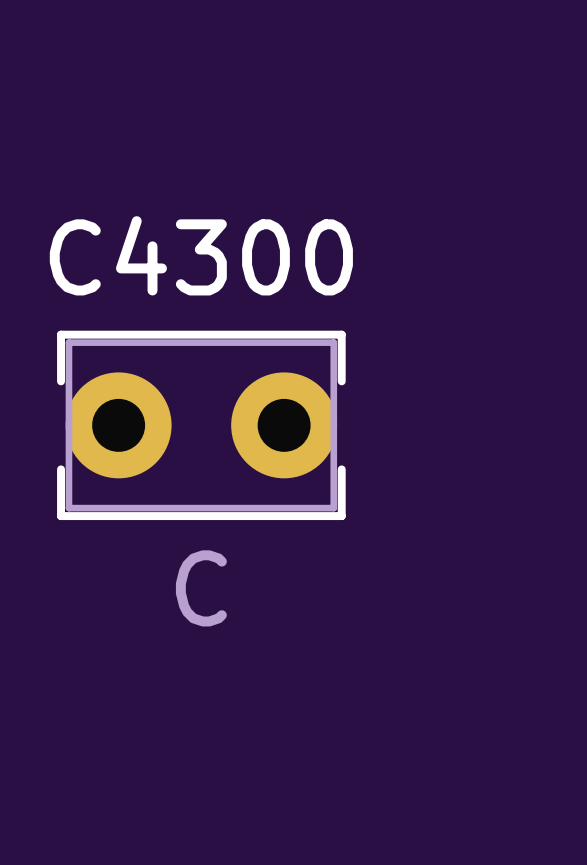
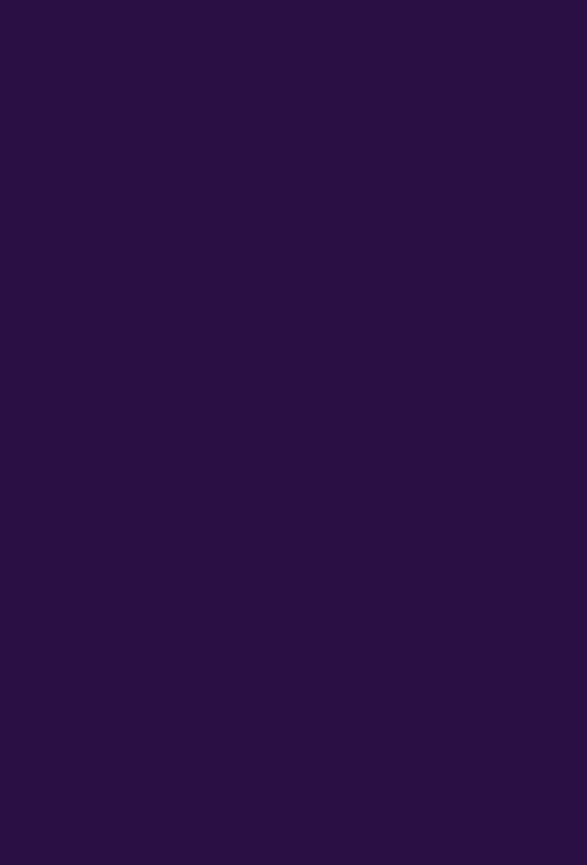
C4300: C (201, 425) -> none

